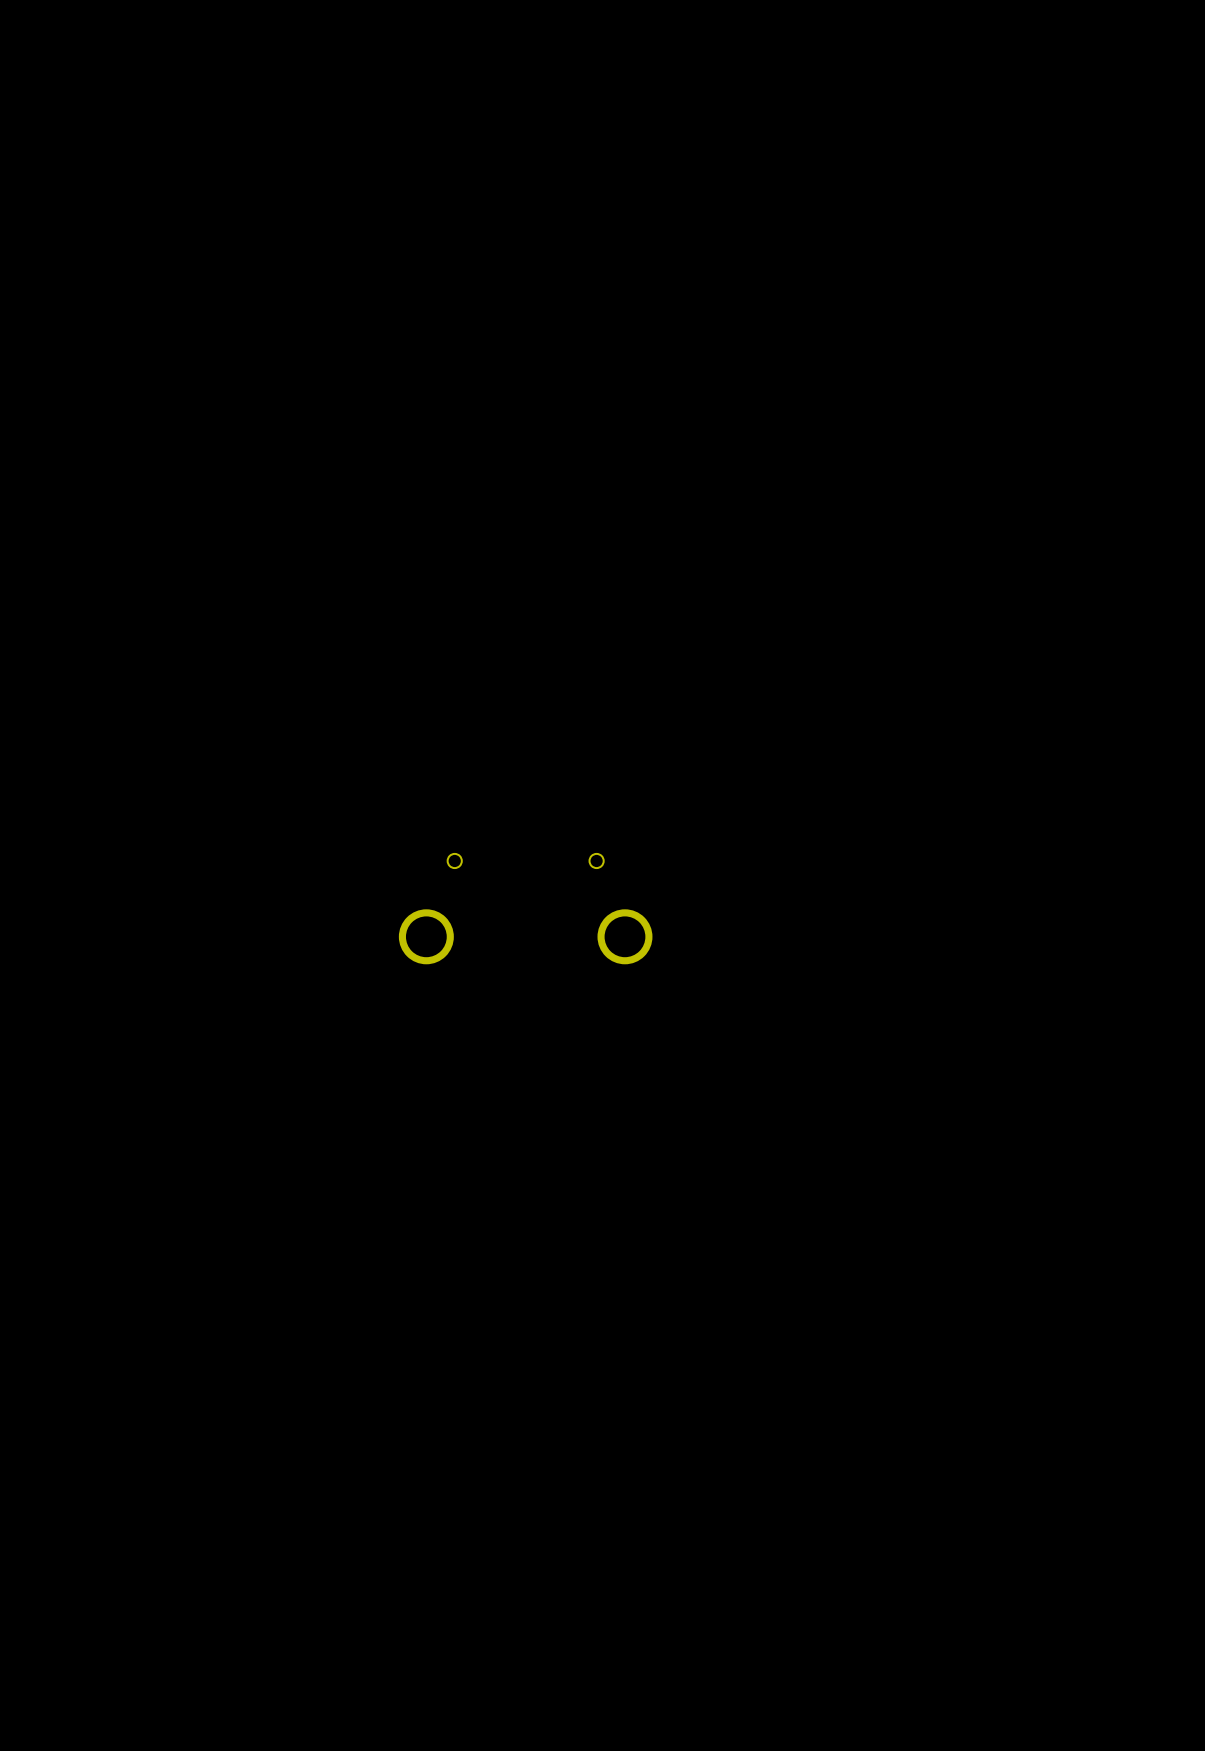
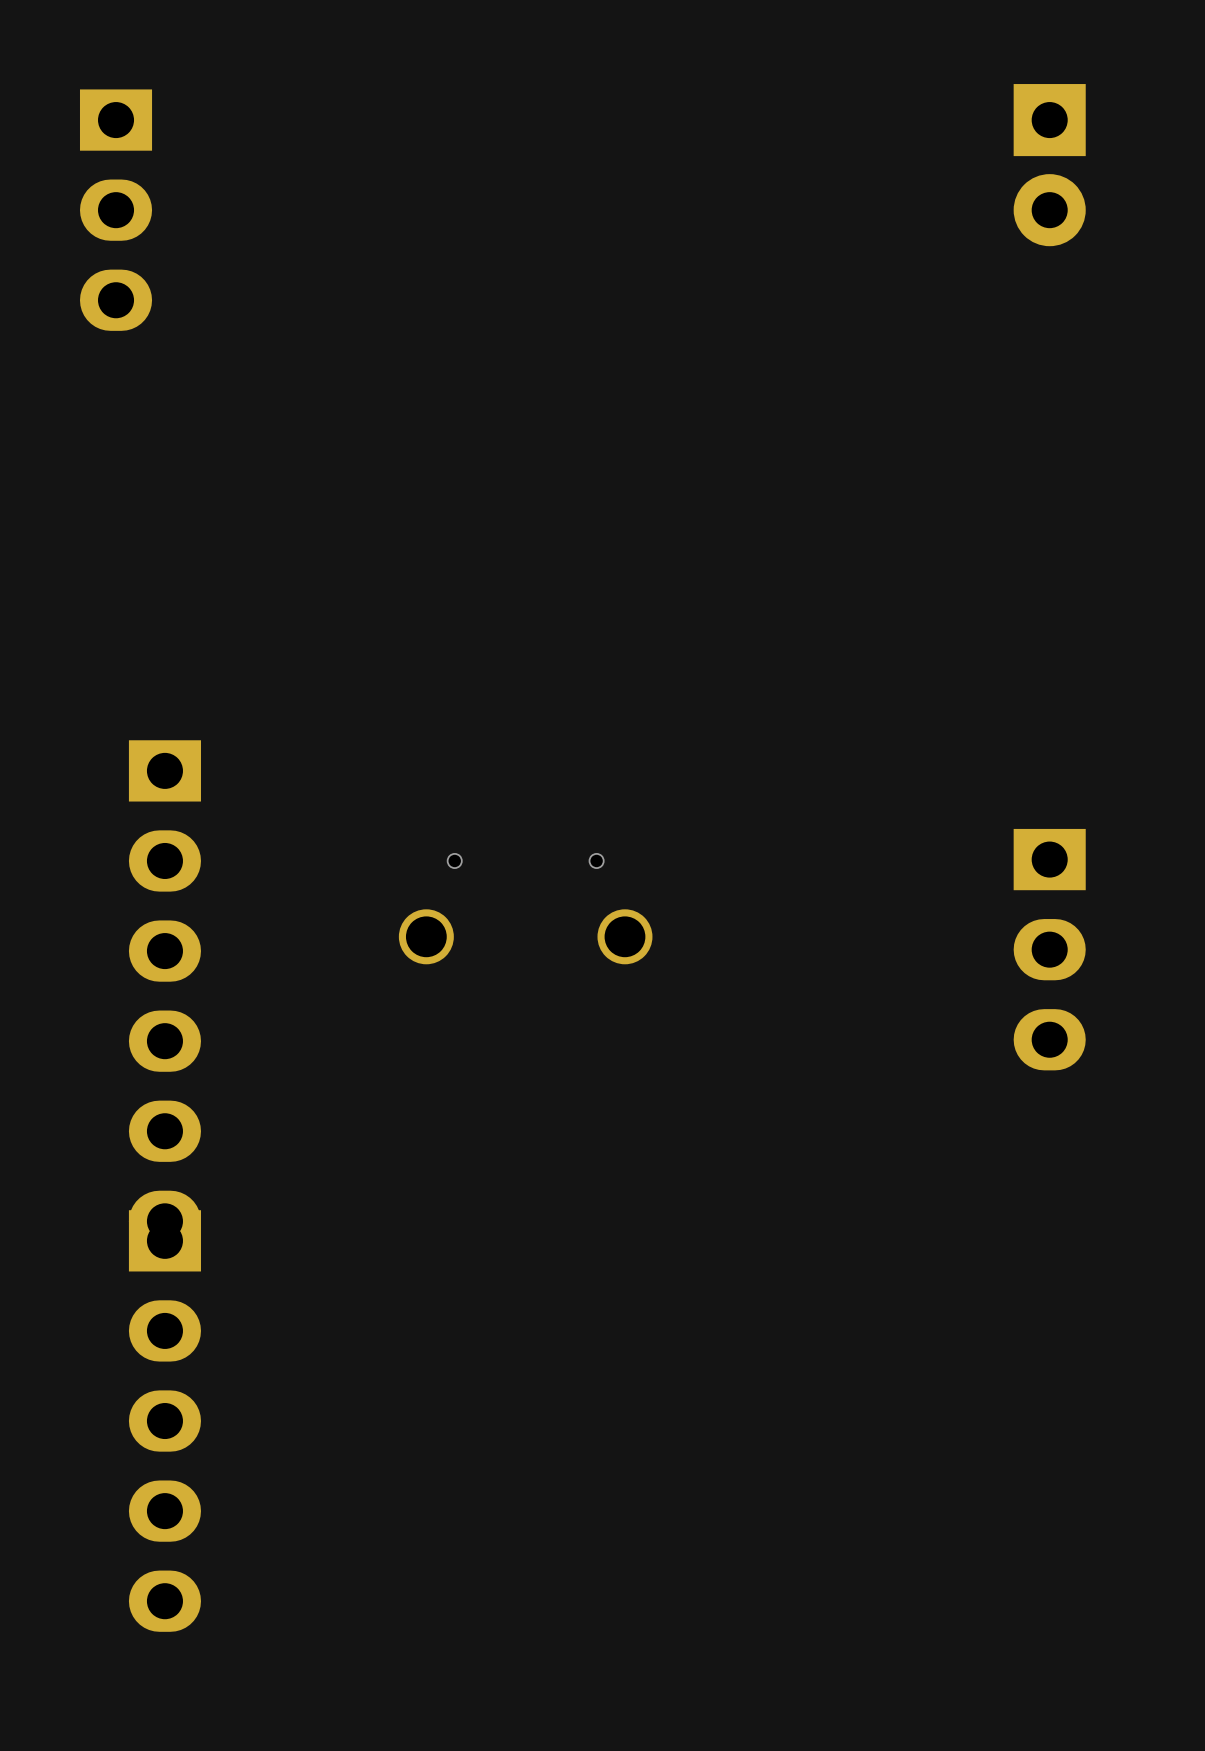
part: none -> (1049, 165)
part: none -> (116, 210)
part: none -> (1049, 949)
part: none -> (164, 996)
part: none -> (164, 1421)

